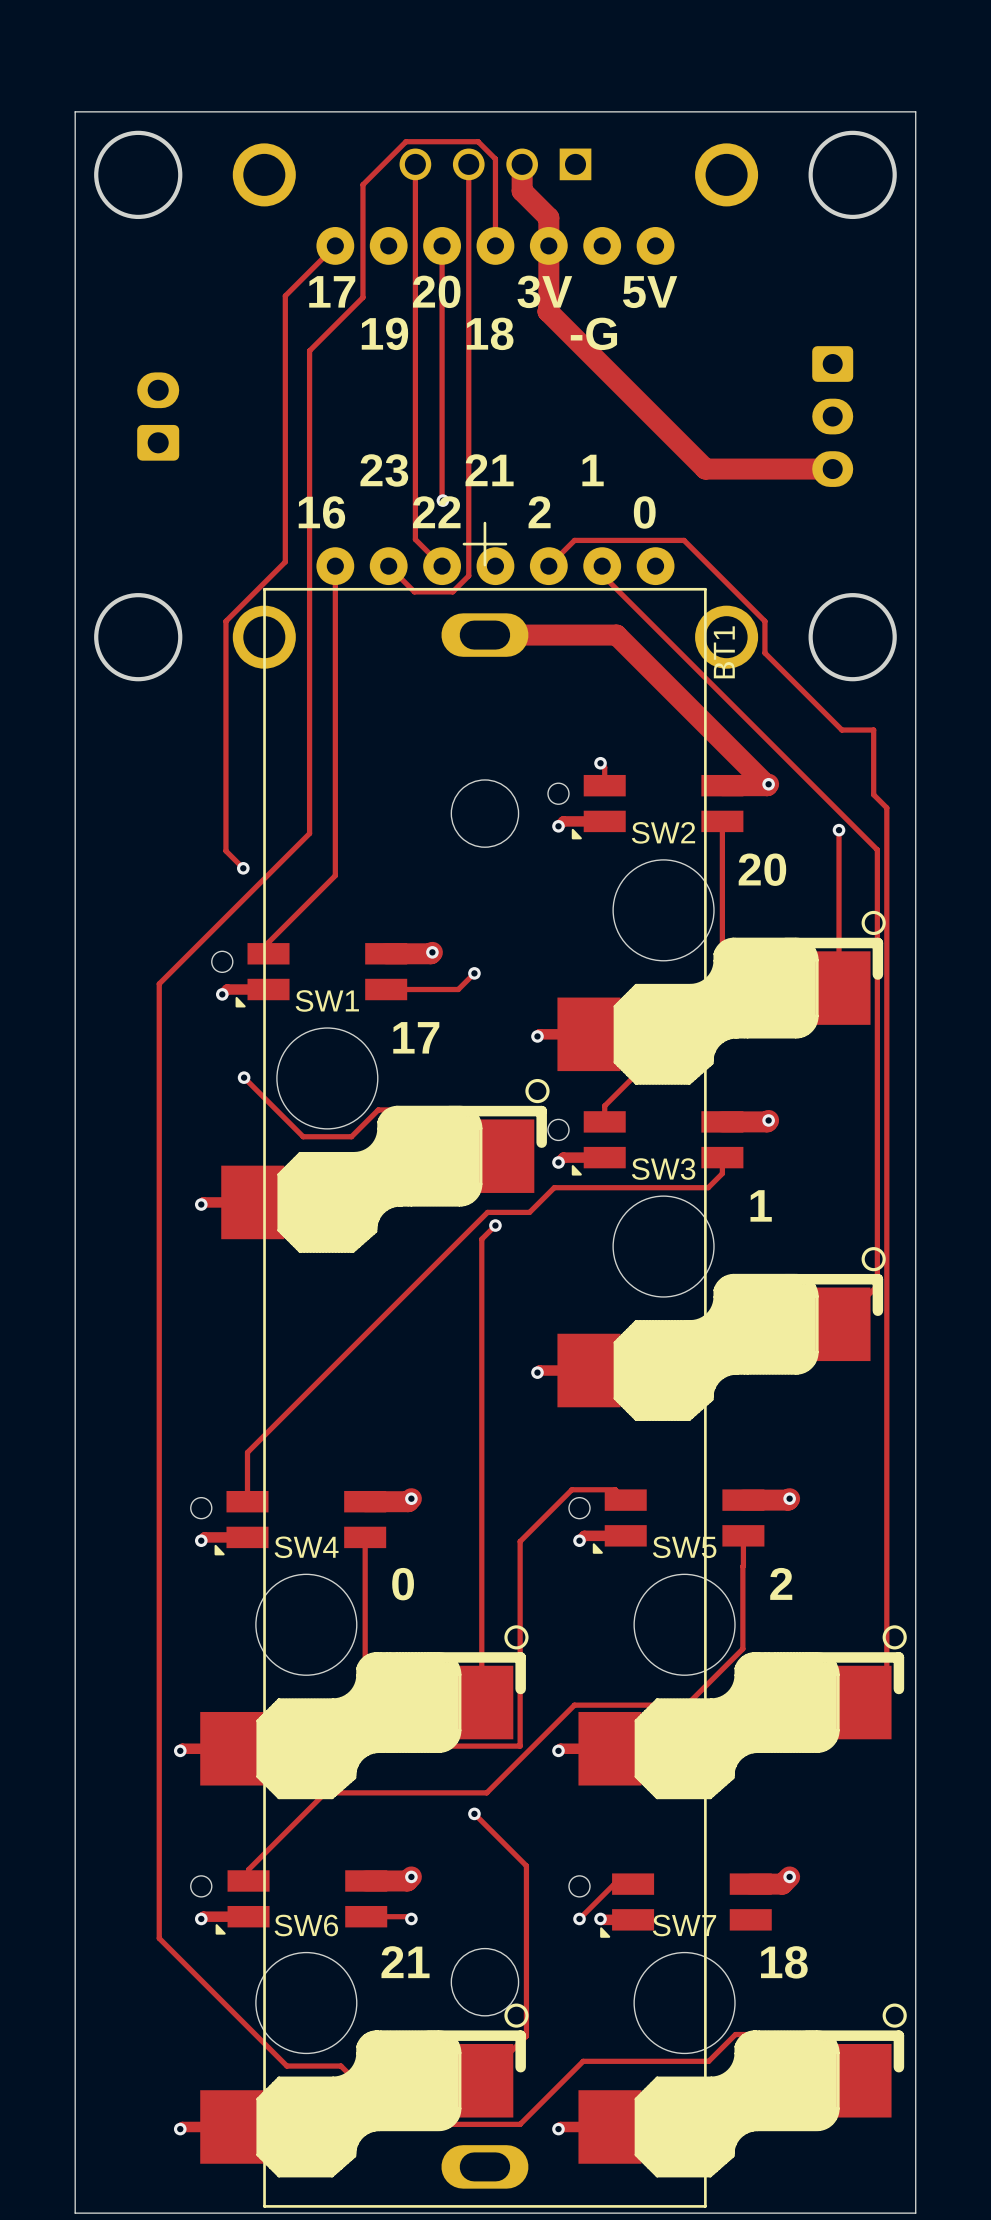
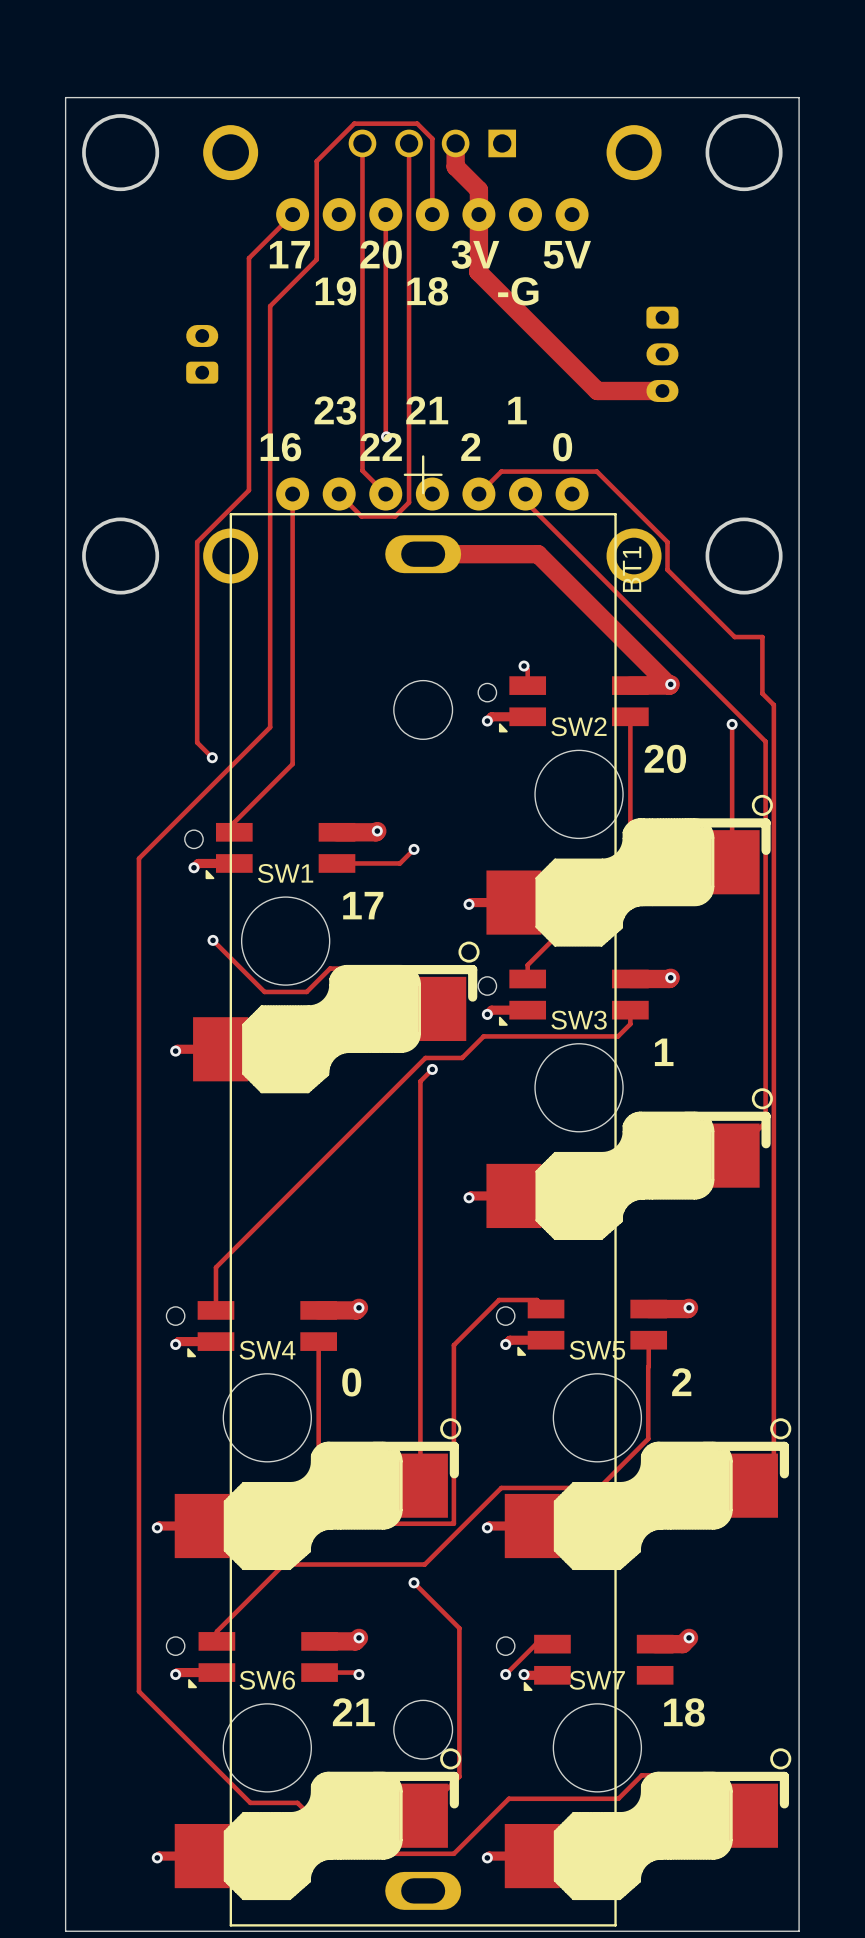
part: none -> (202, 354)
part: none -> (662, 354)
part: (158, 416) -> none
part: (832, 416) -> none
track: (684, 448) (705, 469) (832, 469) -> (597, 390) (662, 390)

